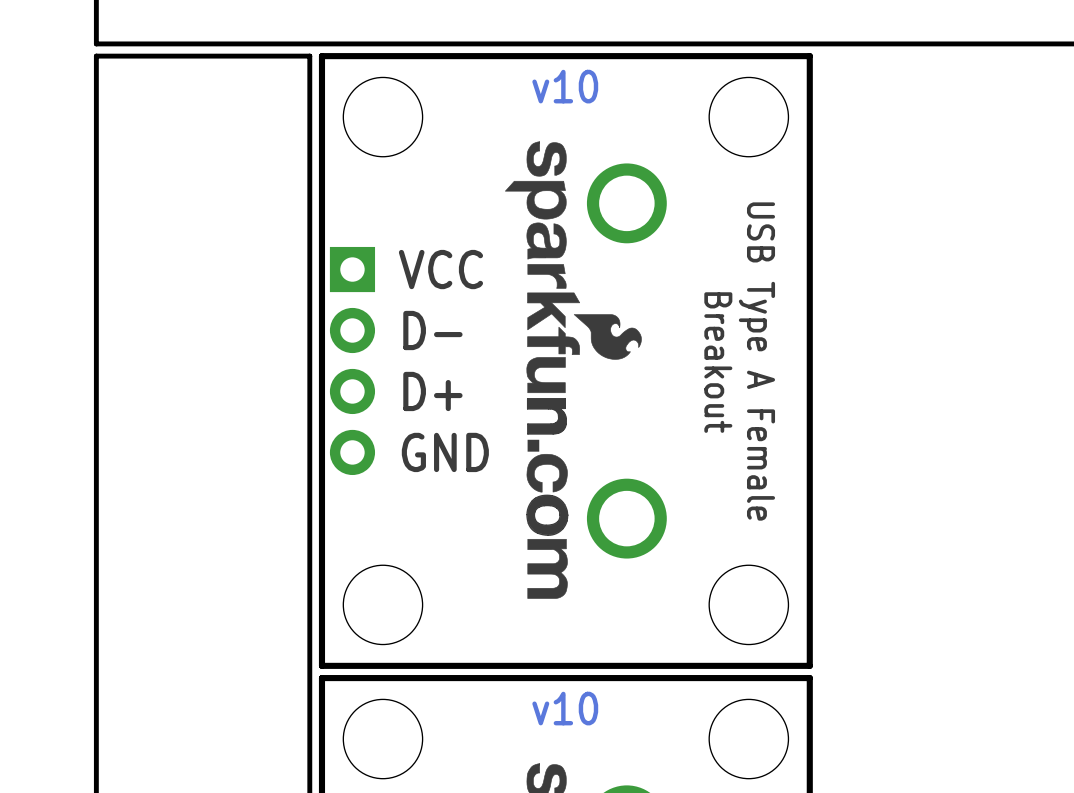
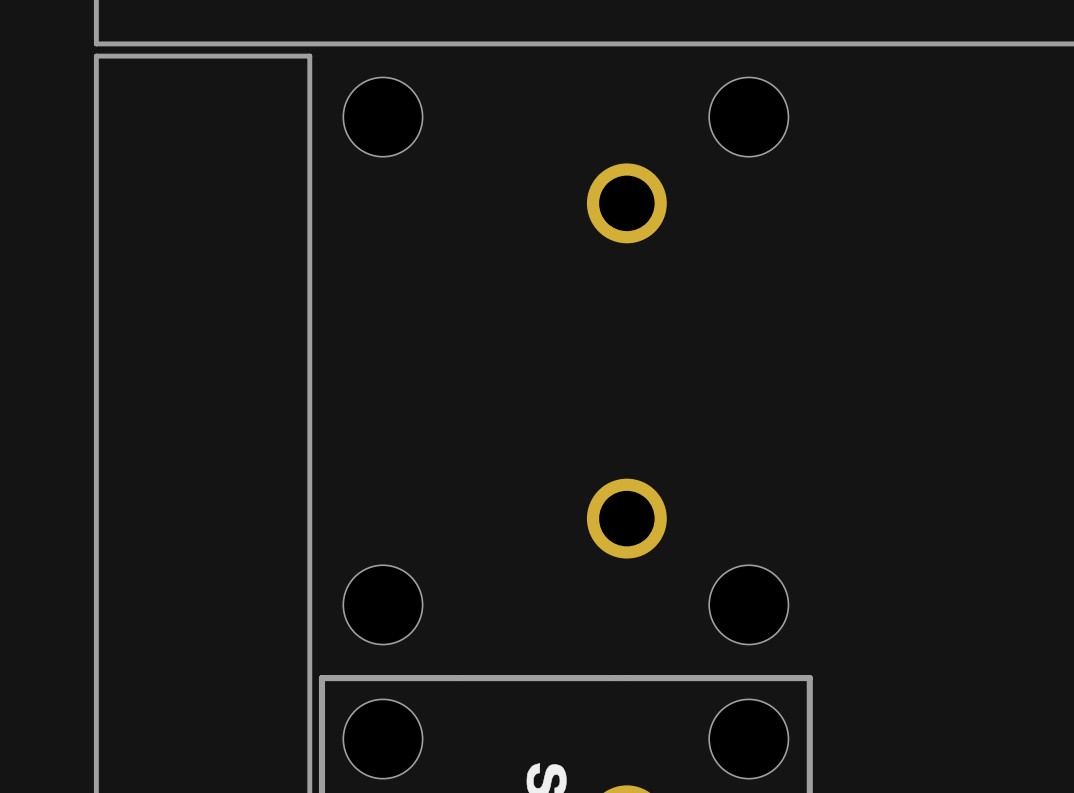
board edge: (809, 56) (809, 665) (321, 665) (321, 56) (809, 56) -> none
text: v10 (565, 86) -> none
drawing: [505, 141, 642, 599] -> none
text: VCC (440, 269) -> none
text: D- (432, 330) -> none
part: (352, 360) -> none
text: USB Type A Female (756, 361) -> none
text: Breakout (718, 362) -> none
text: D+ (432, 391) -> none
text: GND (445, 452) -> none
text: v10 (565, 708) -> none

